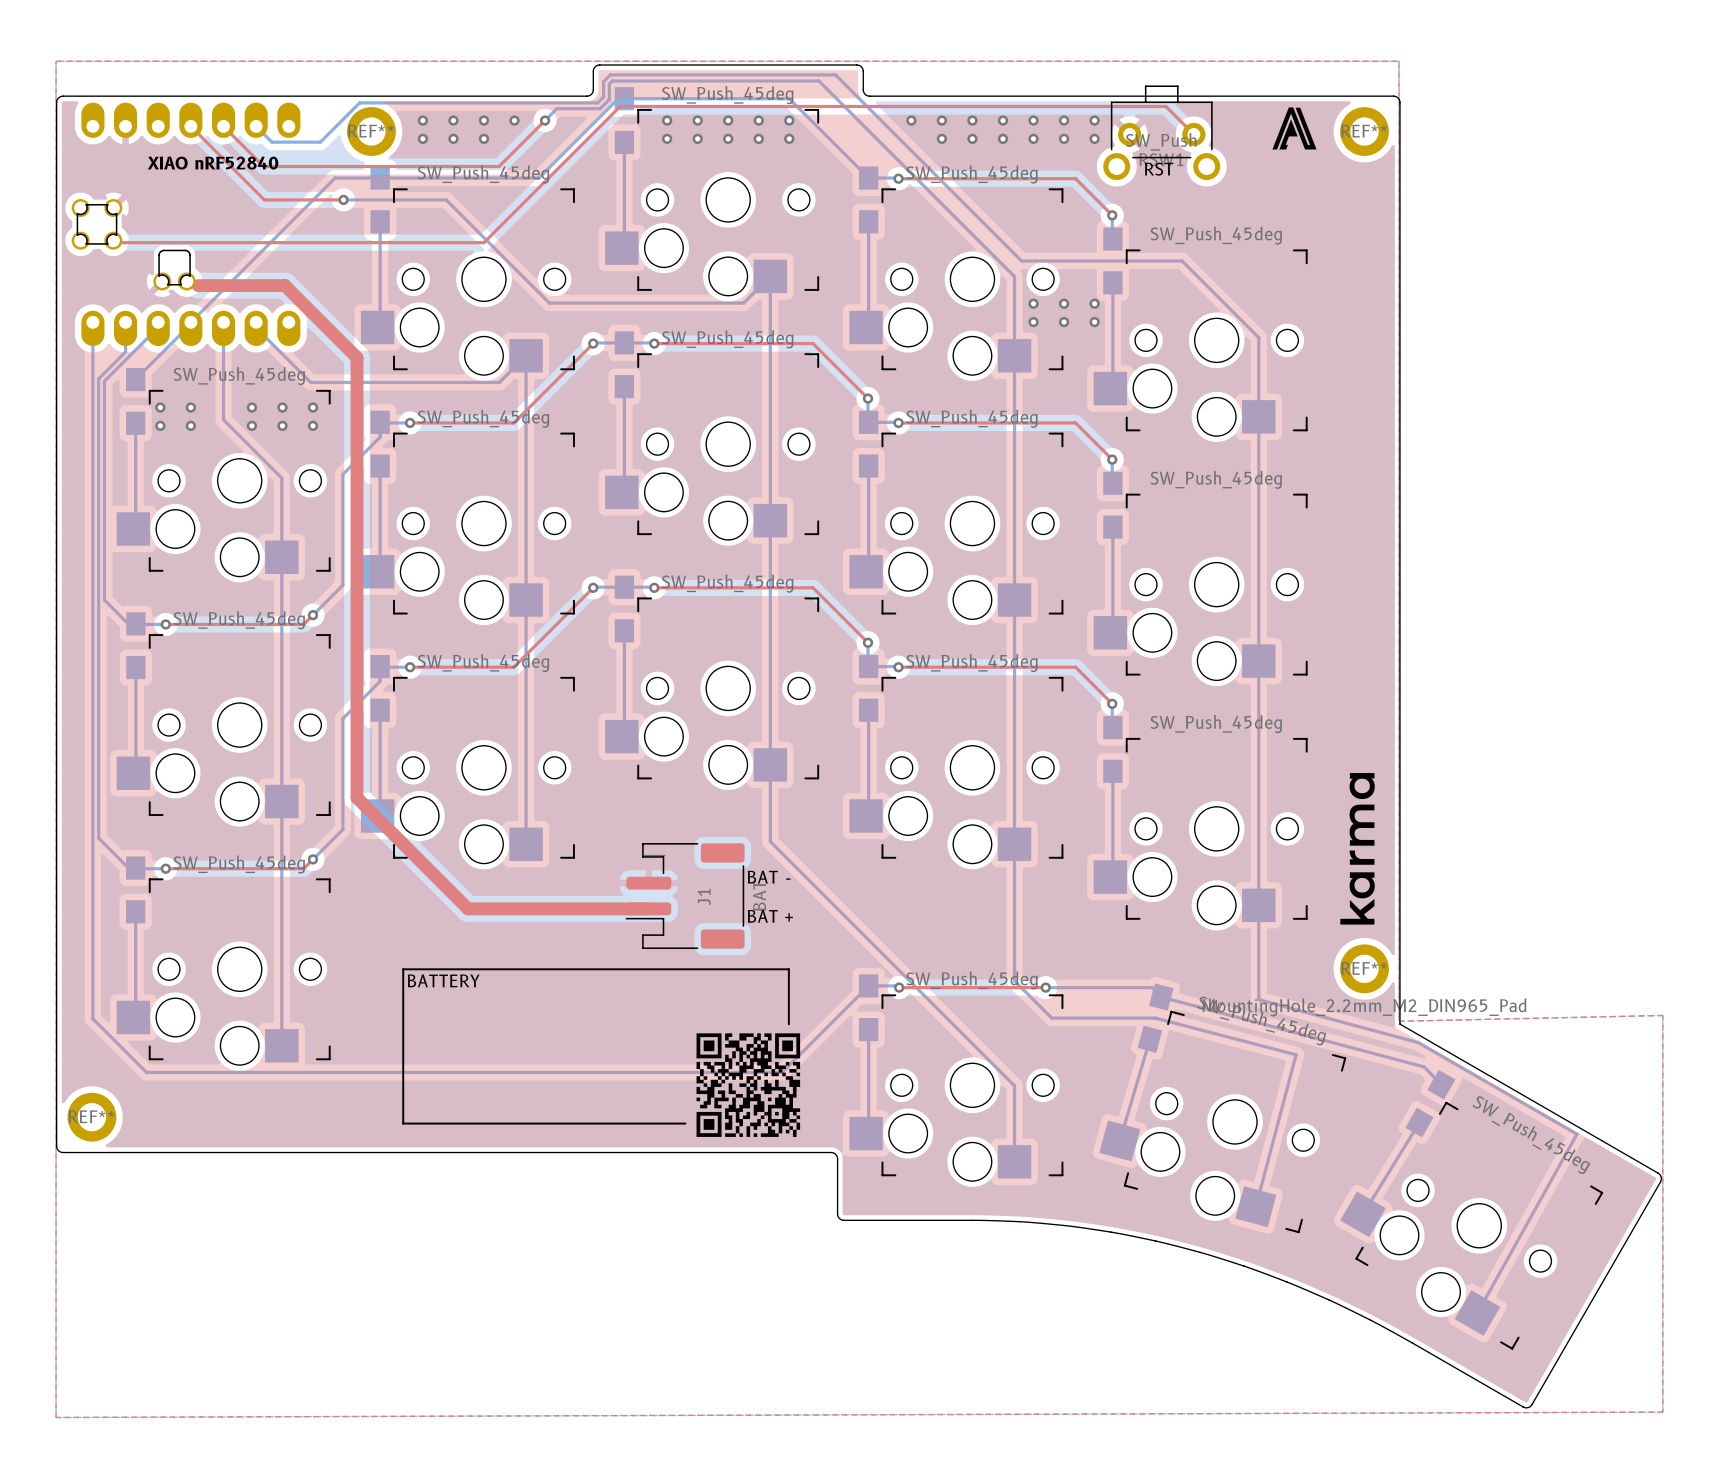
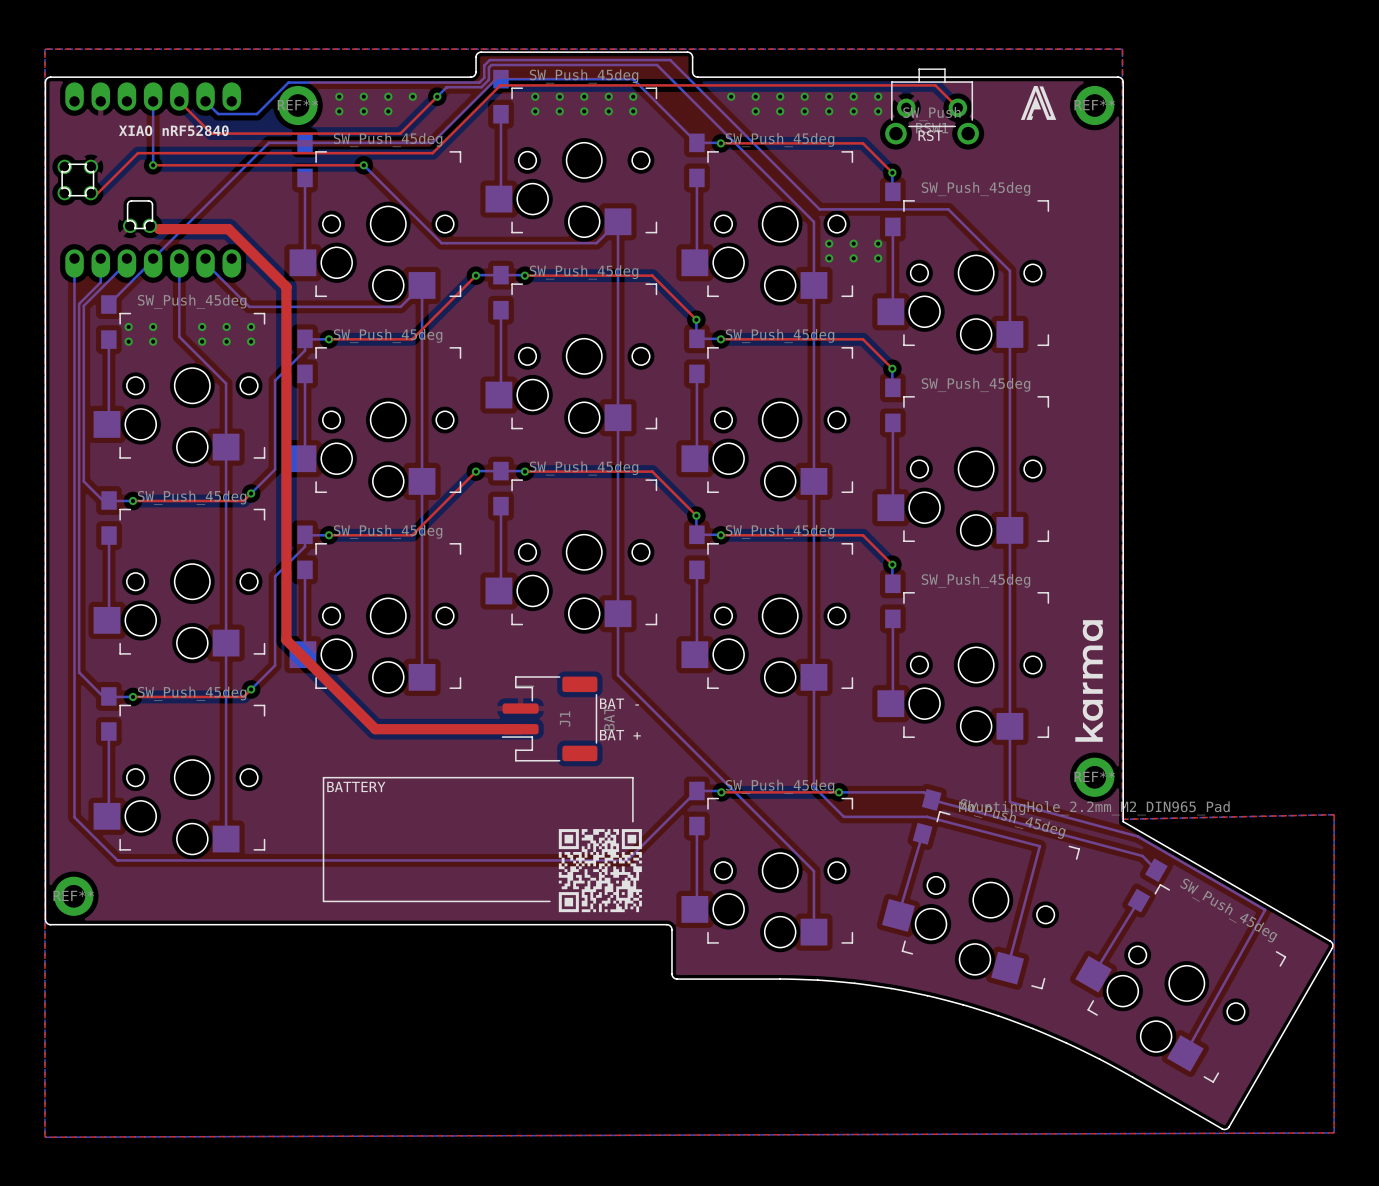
top track: (623, 106) (620, 106) (483, 242) (114, 241) -> (500, 85) (432, 153) (137, 153) (96, 194) (93, 194)
top track: (190, 126) (264, 199) (343, 199) -> none
bottom track: none -> (153, 101) (153, 165)
bottom track: (343, 199) (446, 199) (550, 303) -> (363, 165) (441, 243)
via: (343, 199) -> none
top track: none -> (153, 165) (363, 165)
via: none -> (153, 165)
via: none -> (363, 165)

